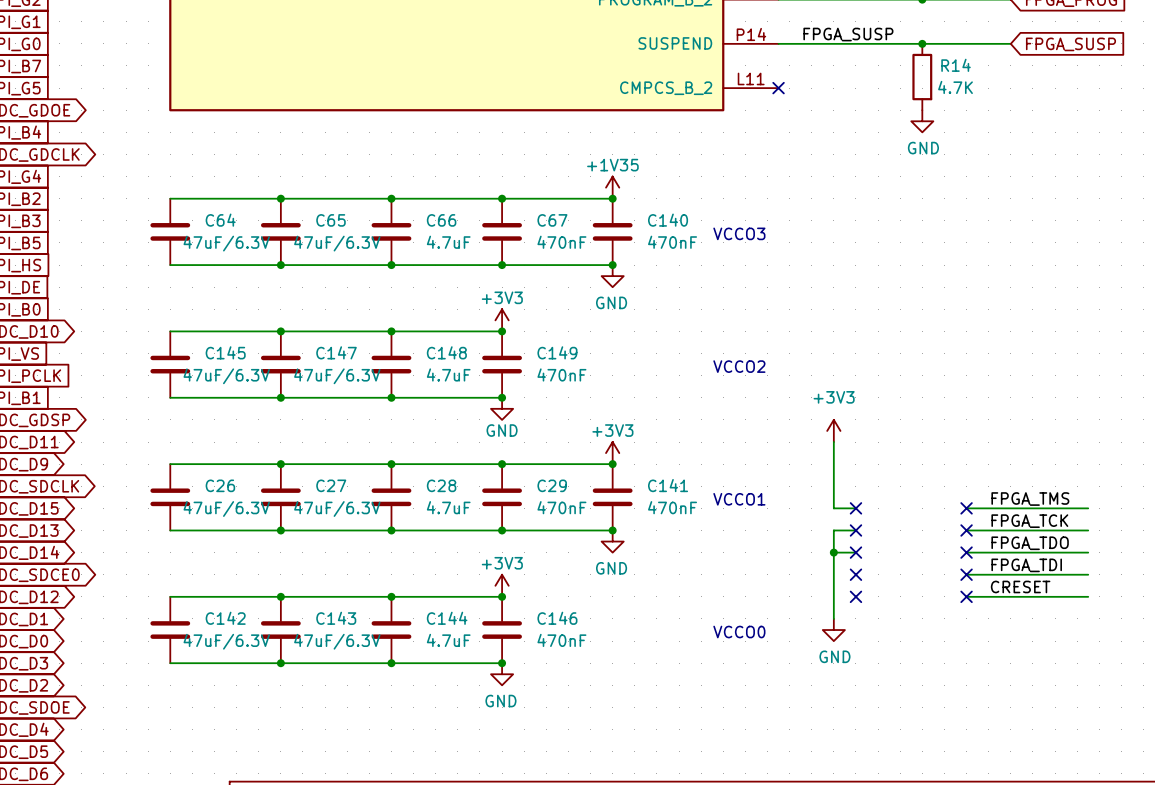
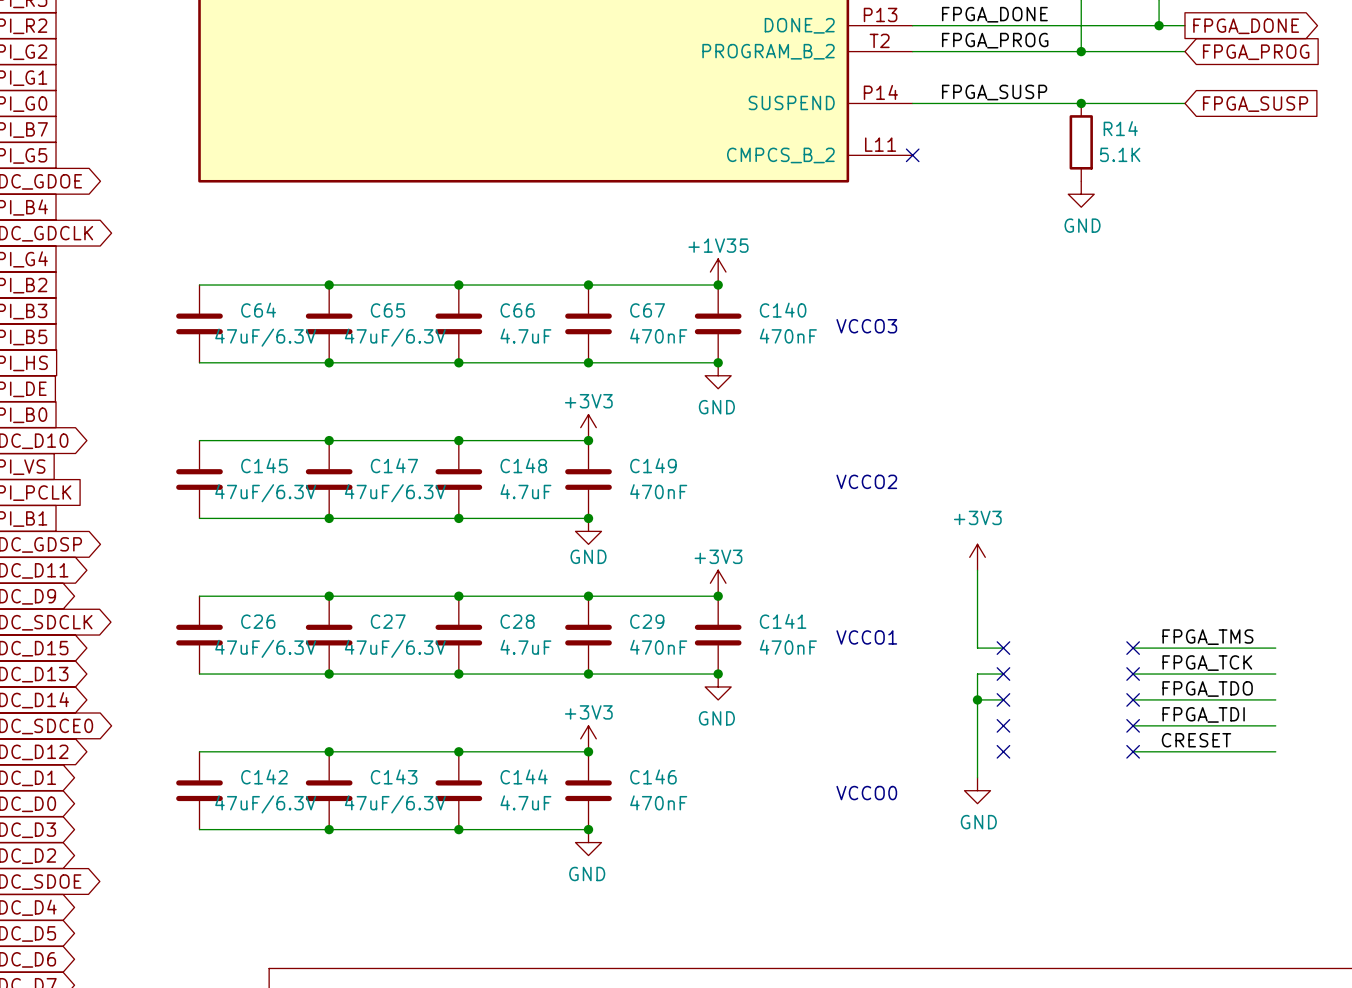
R14 value: 4.7K (955, 87) -> 5.1K (1120, 154)

